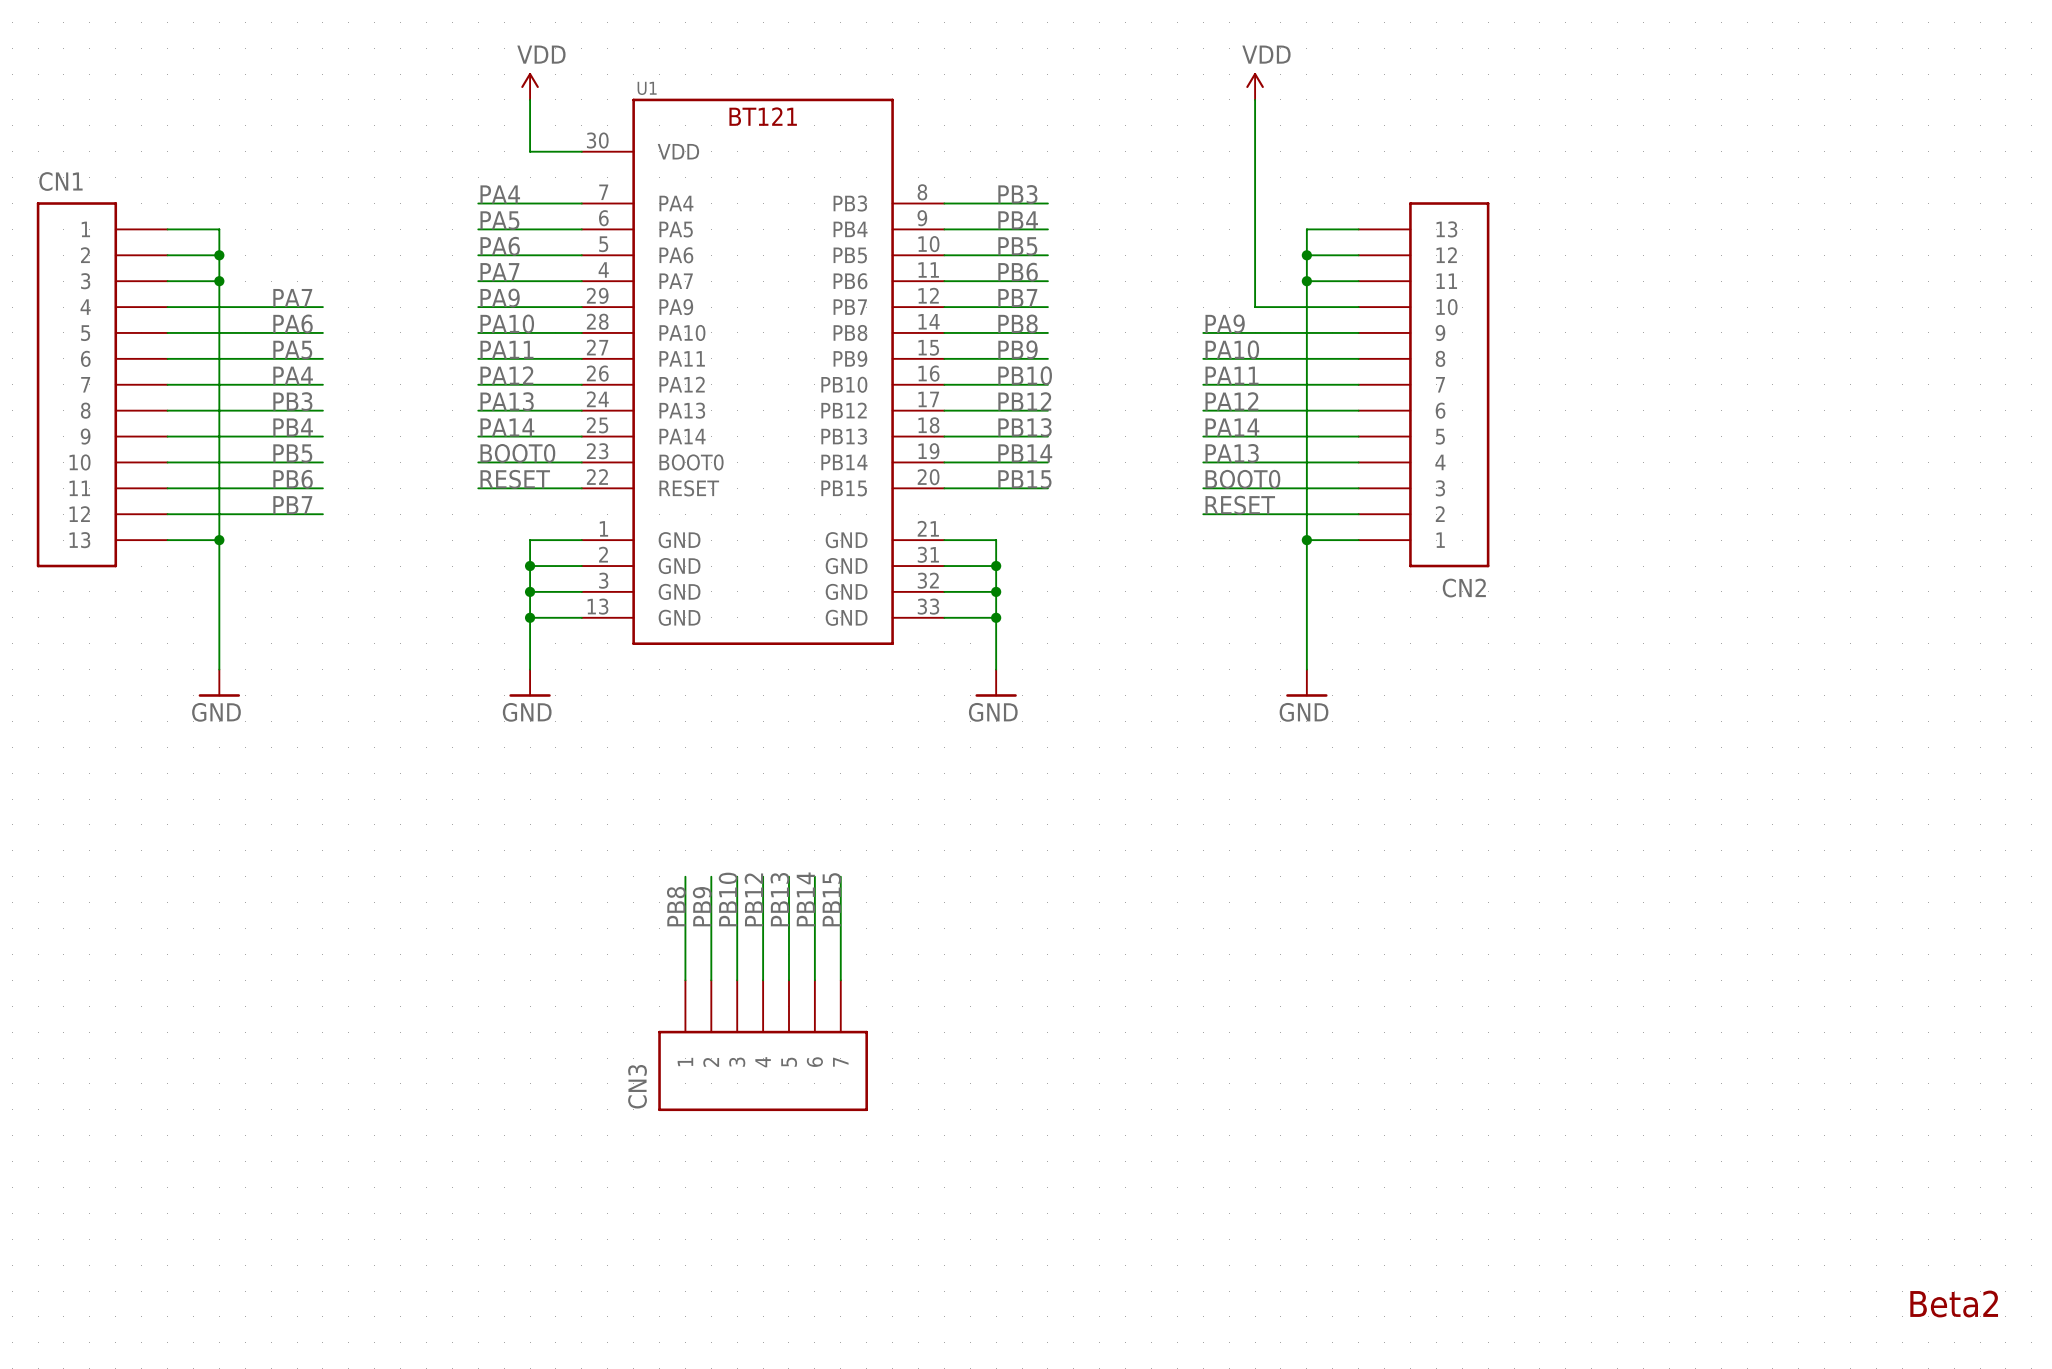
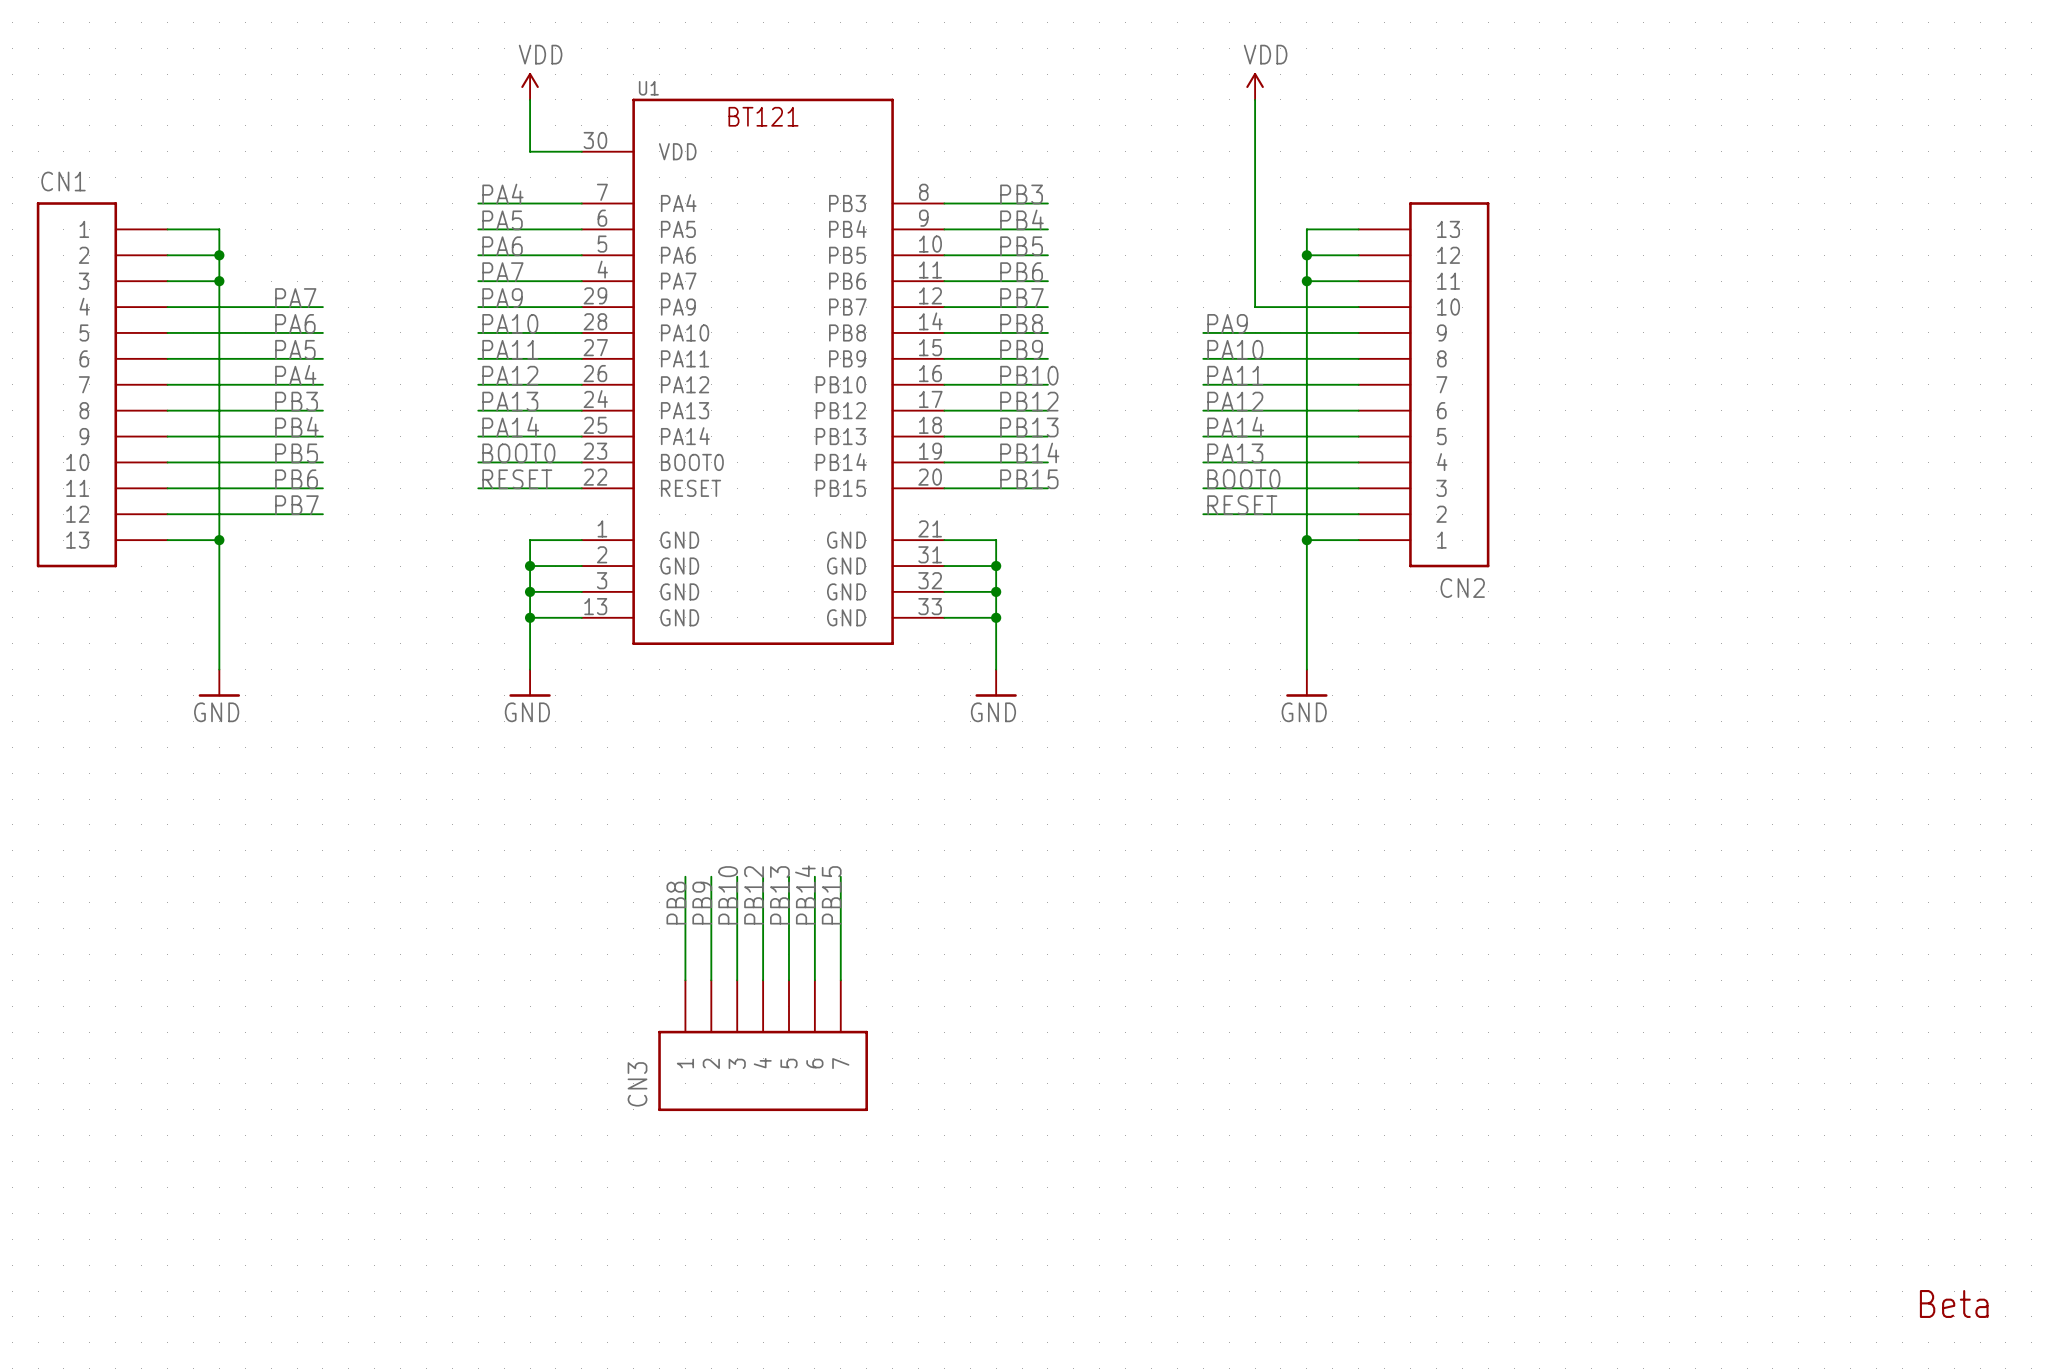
text: Beta2 (1954, 1304) -> Beta (1954, 1303)

